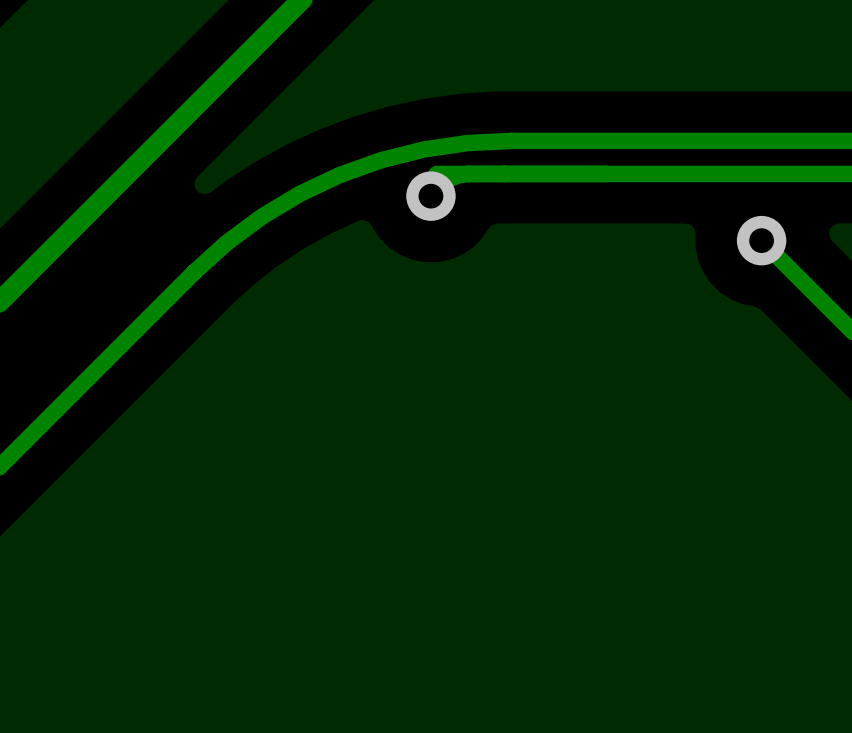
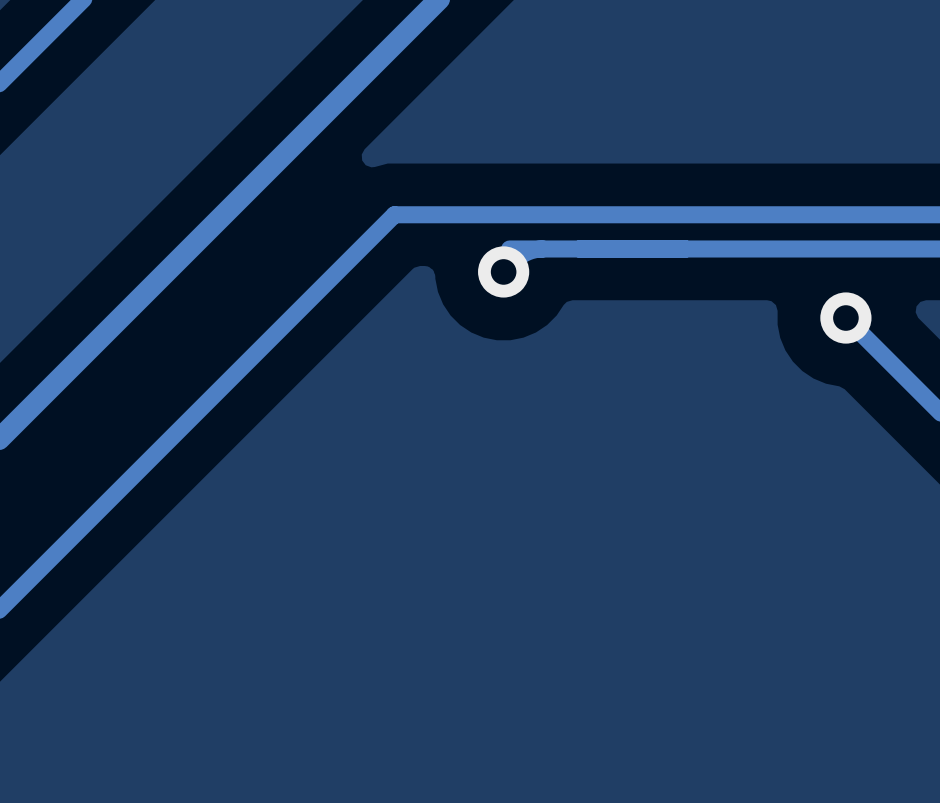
track: (511, 140) (467, 143) (423, 149) (381, 160) (339, 175) (299, 193) (262, 216) (226, 242) (194, 272) -> (586, 214) (394, 214) (258, 350)

